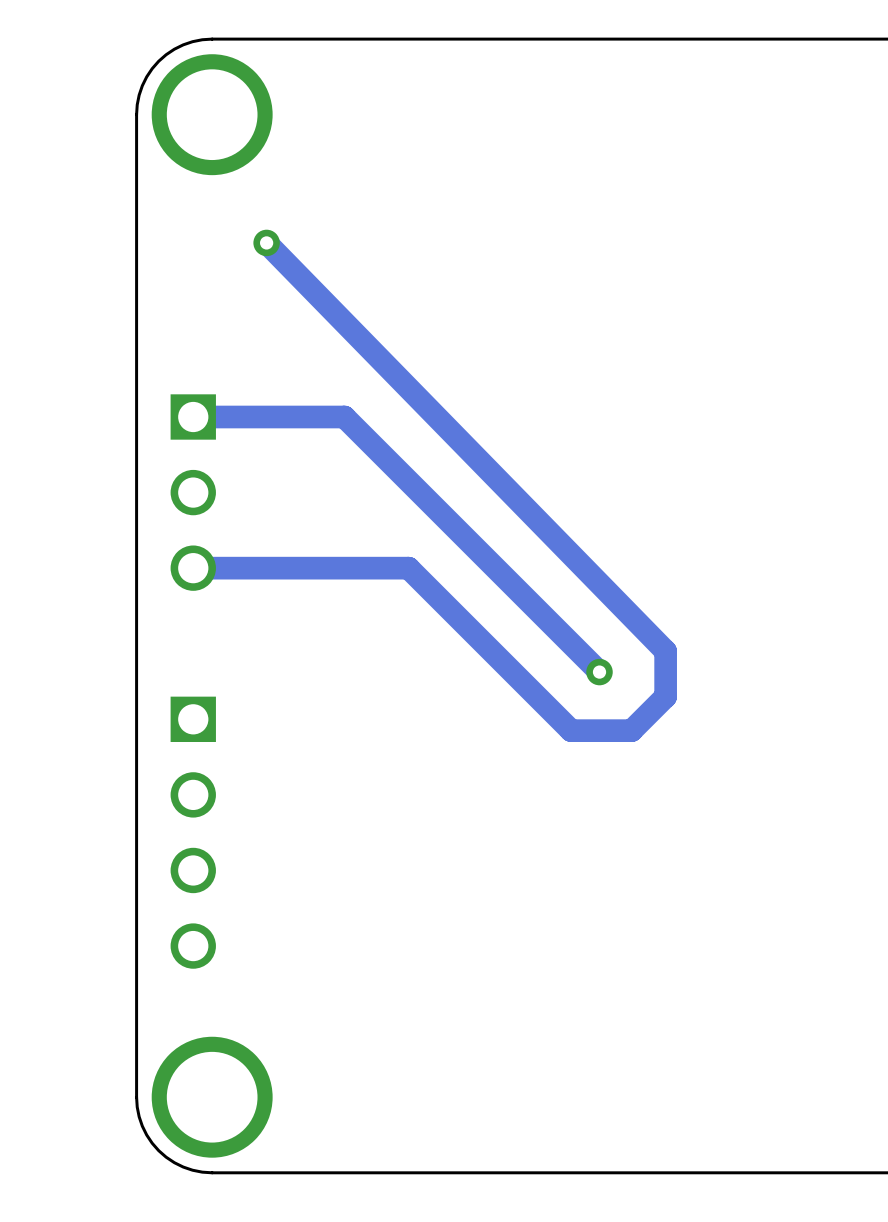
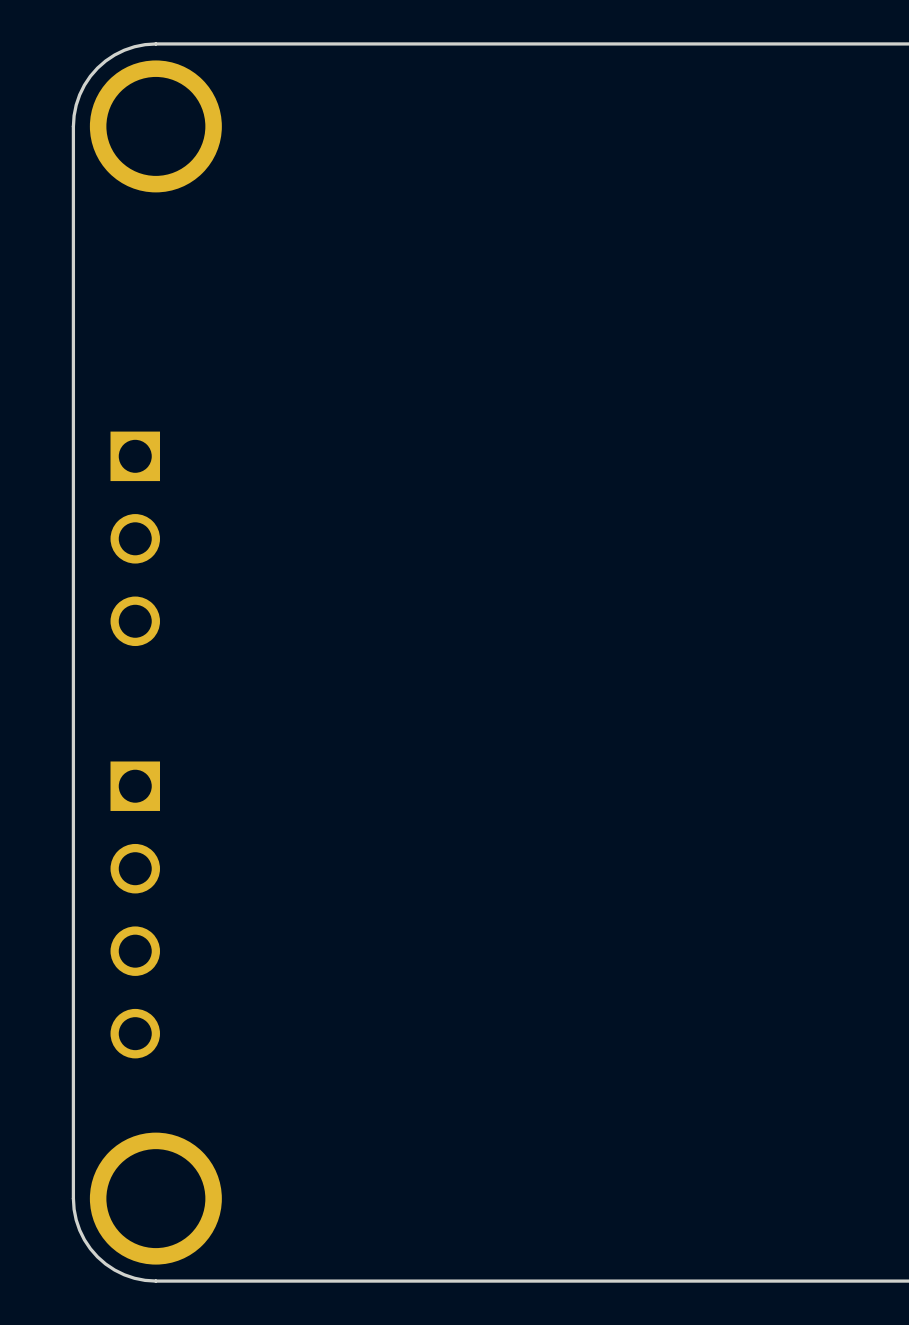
track: (266, 242) (665, 651) (665, 696) (631, 730) (571, 730) (408, 568) (193, 568) -> none
via: (266, 242) -> none
track: (193, 417) (344, 417) (599, 672) -> none
via: (599, 672) -> none

